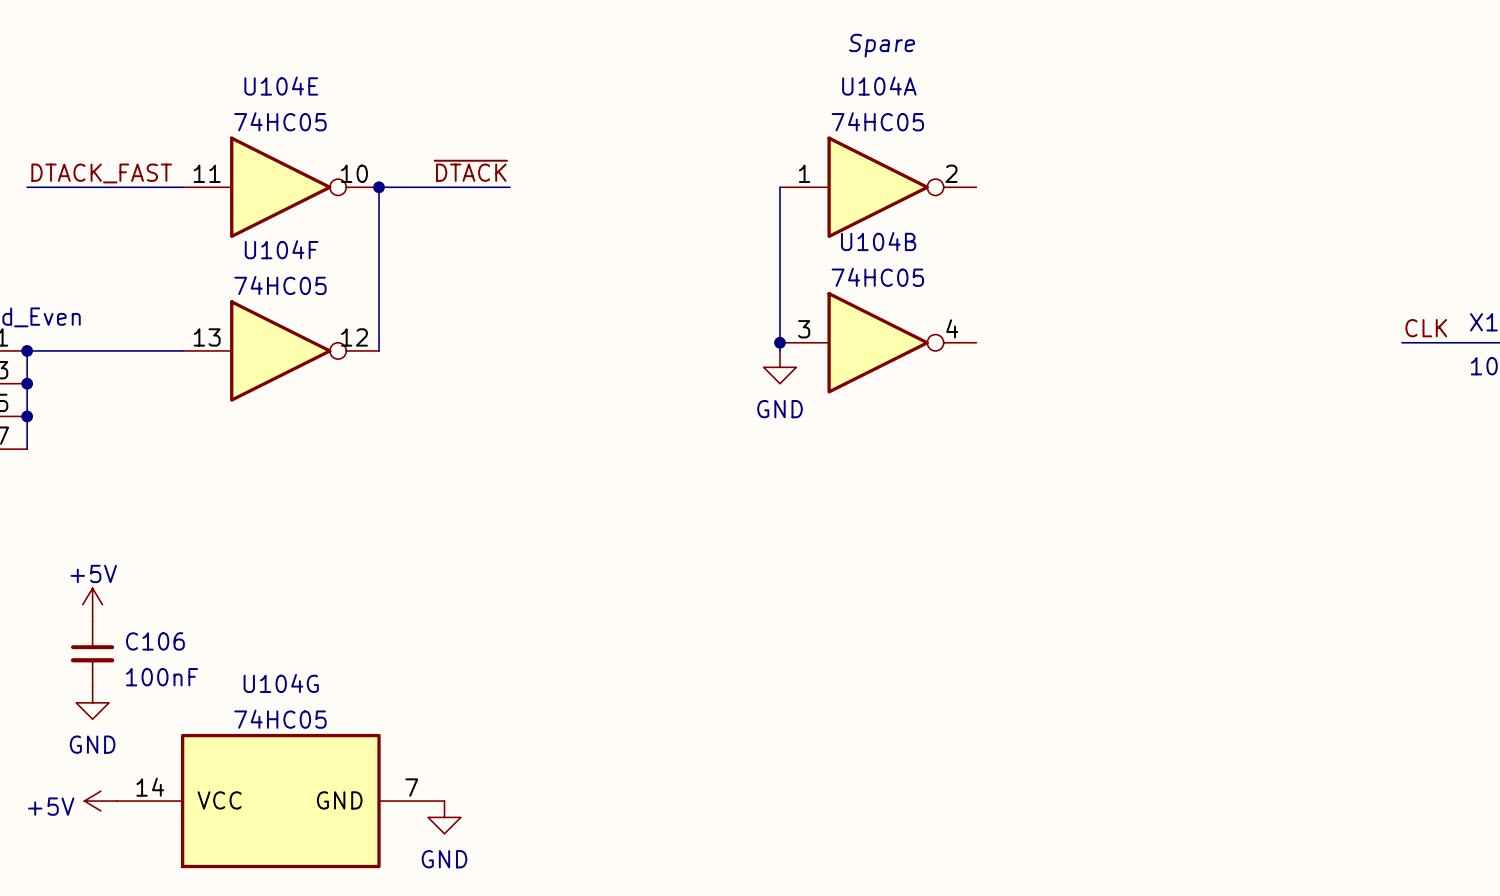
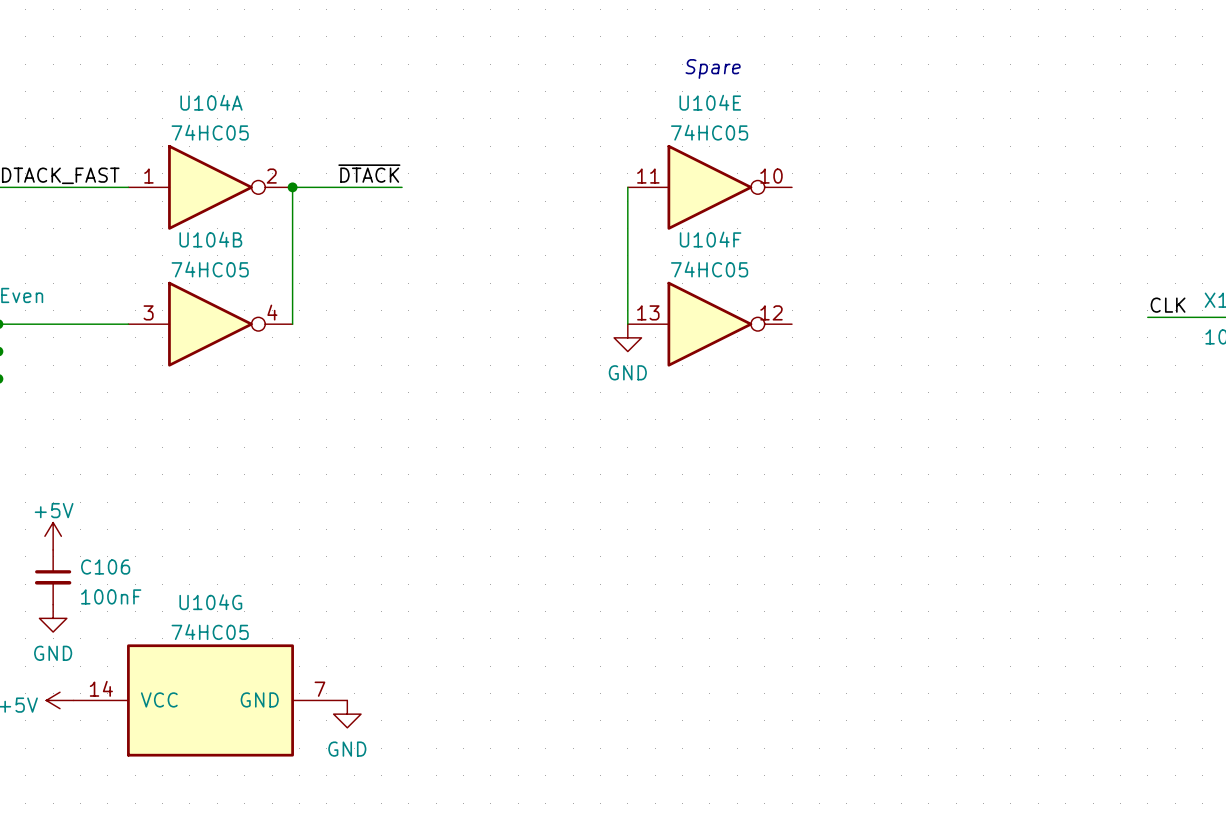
U104E position: (280, 187) -> (709, 187)
U104A position: (878, 187) -> (210, 187)
junction: (780, 342) -> none
U104B position: (878, 342) -> (210, 324)
U104F position: (280, 350) -> (709, 324)

